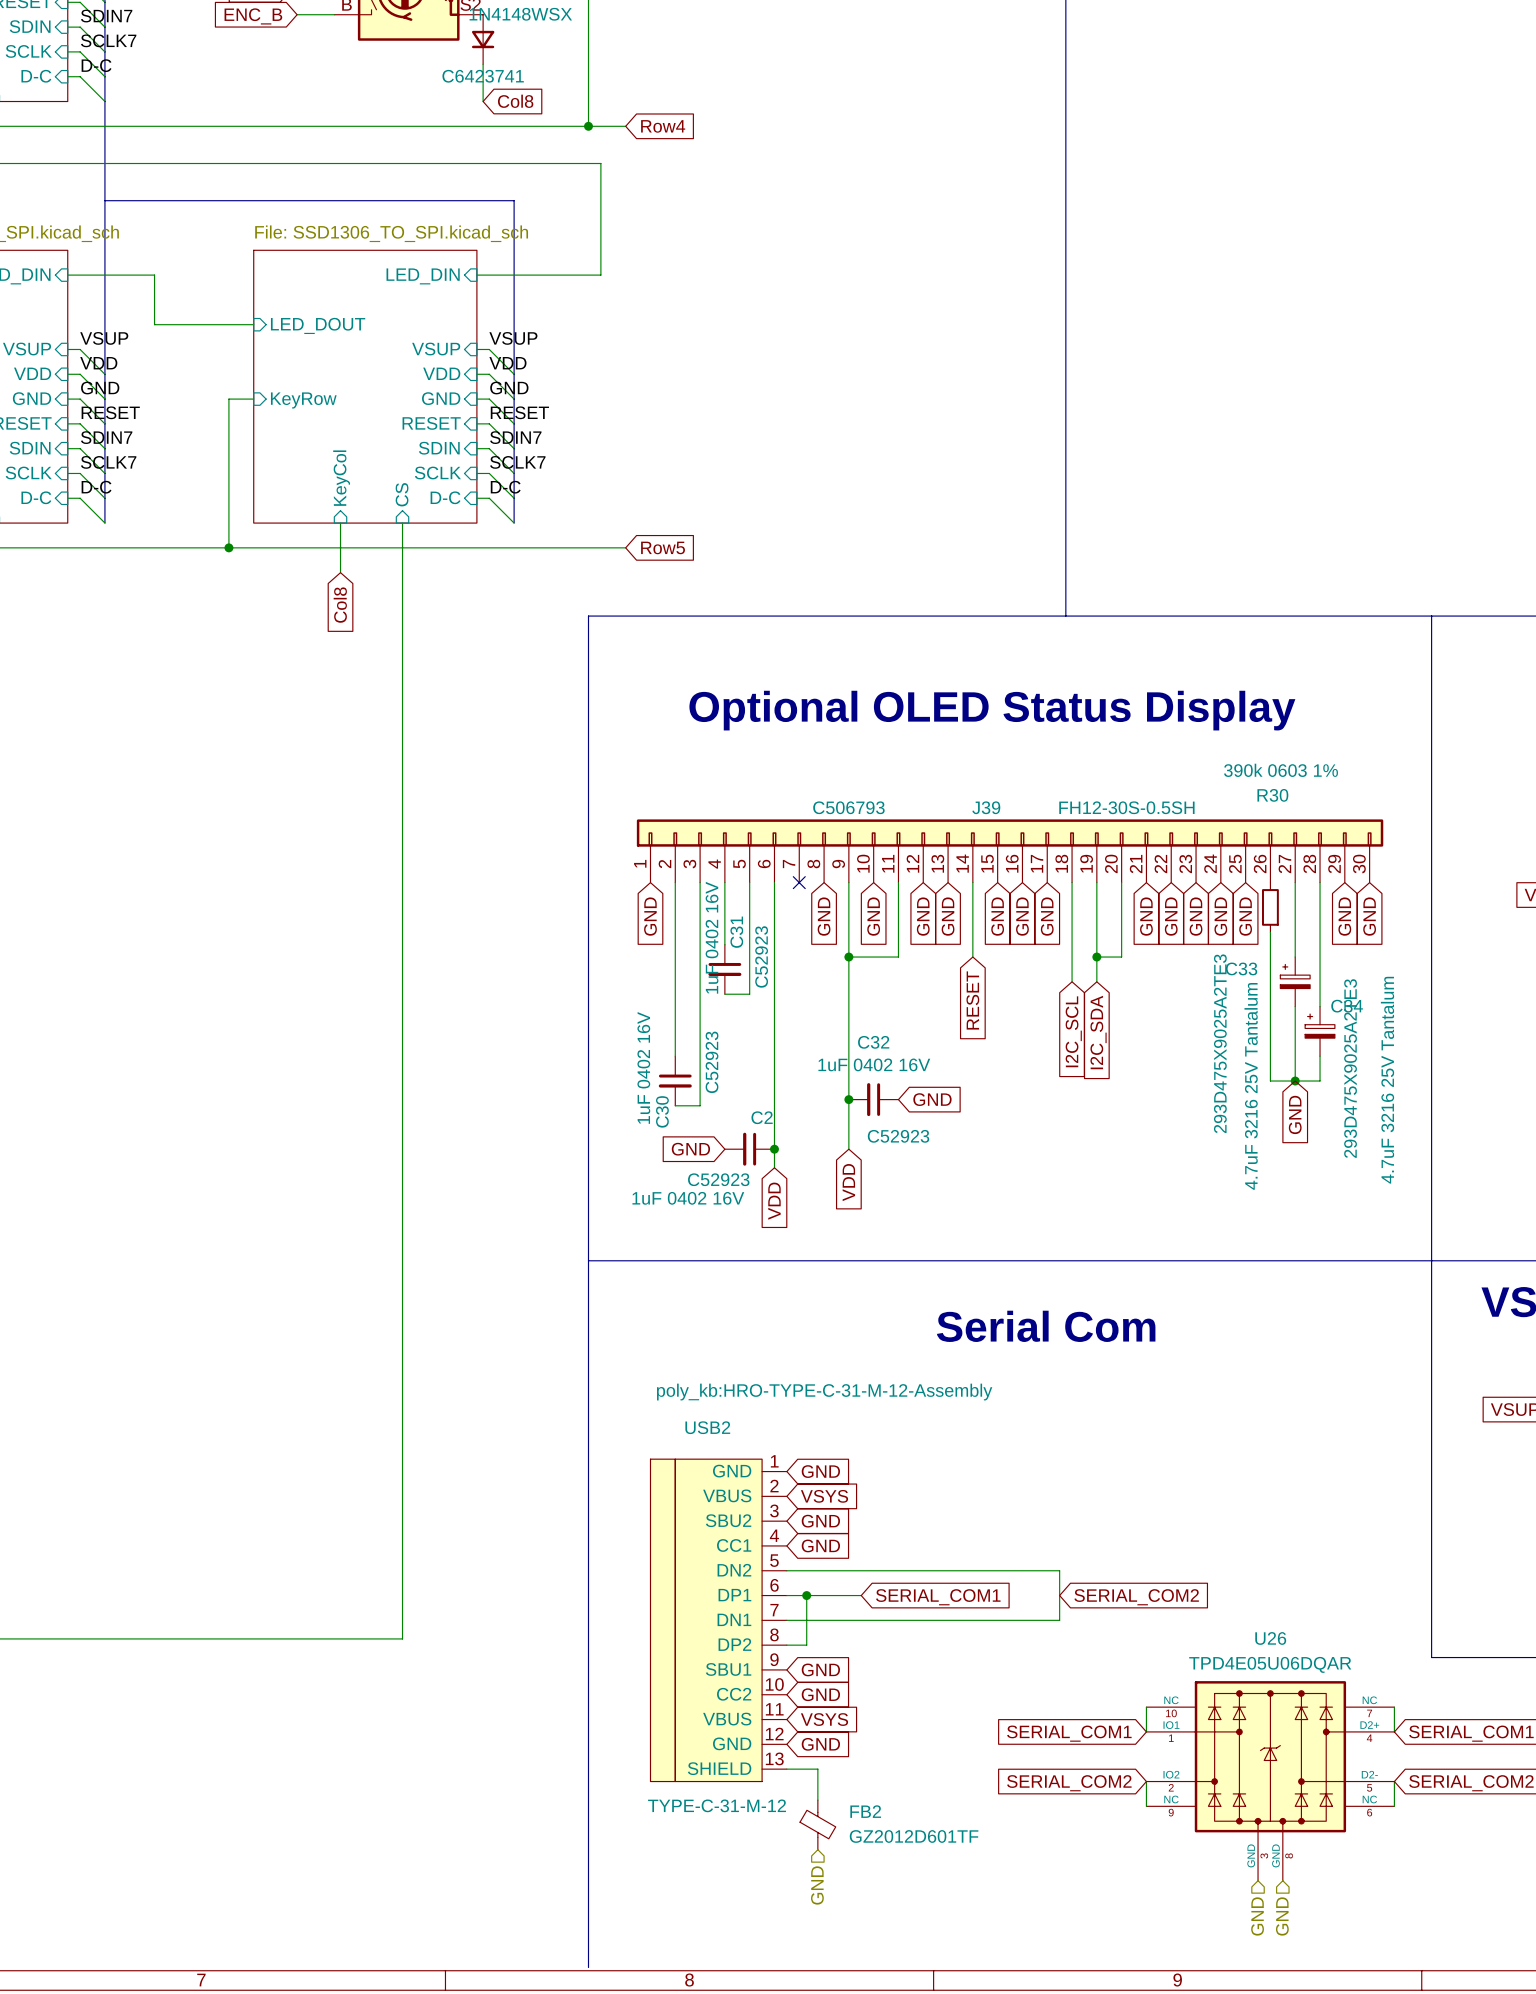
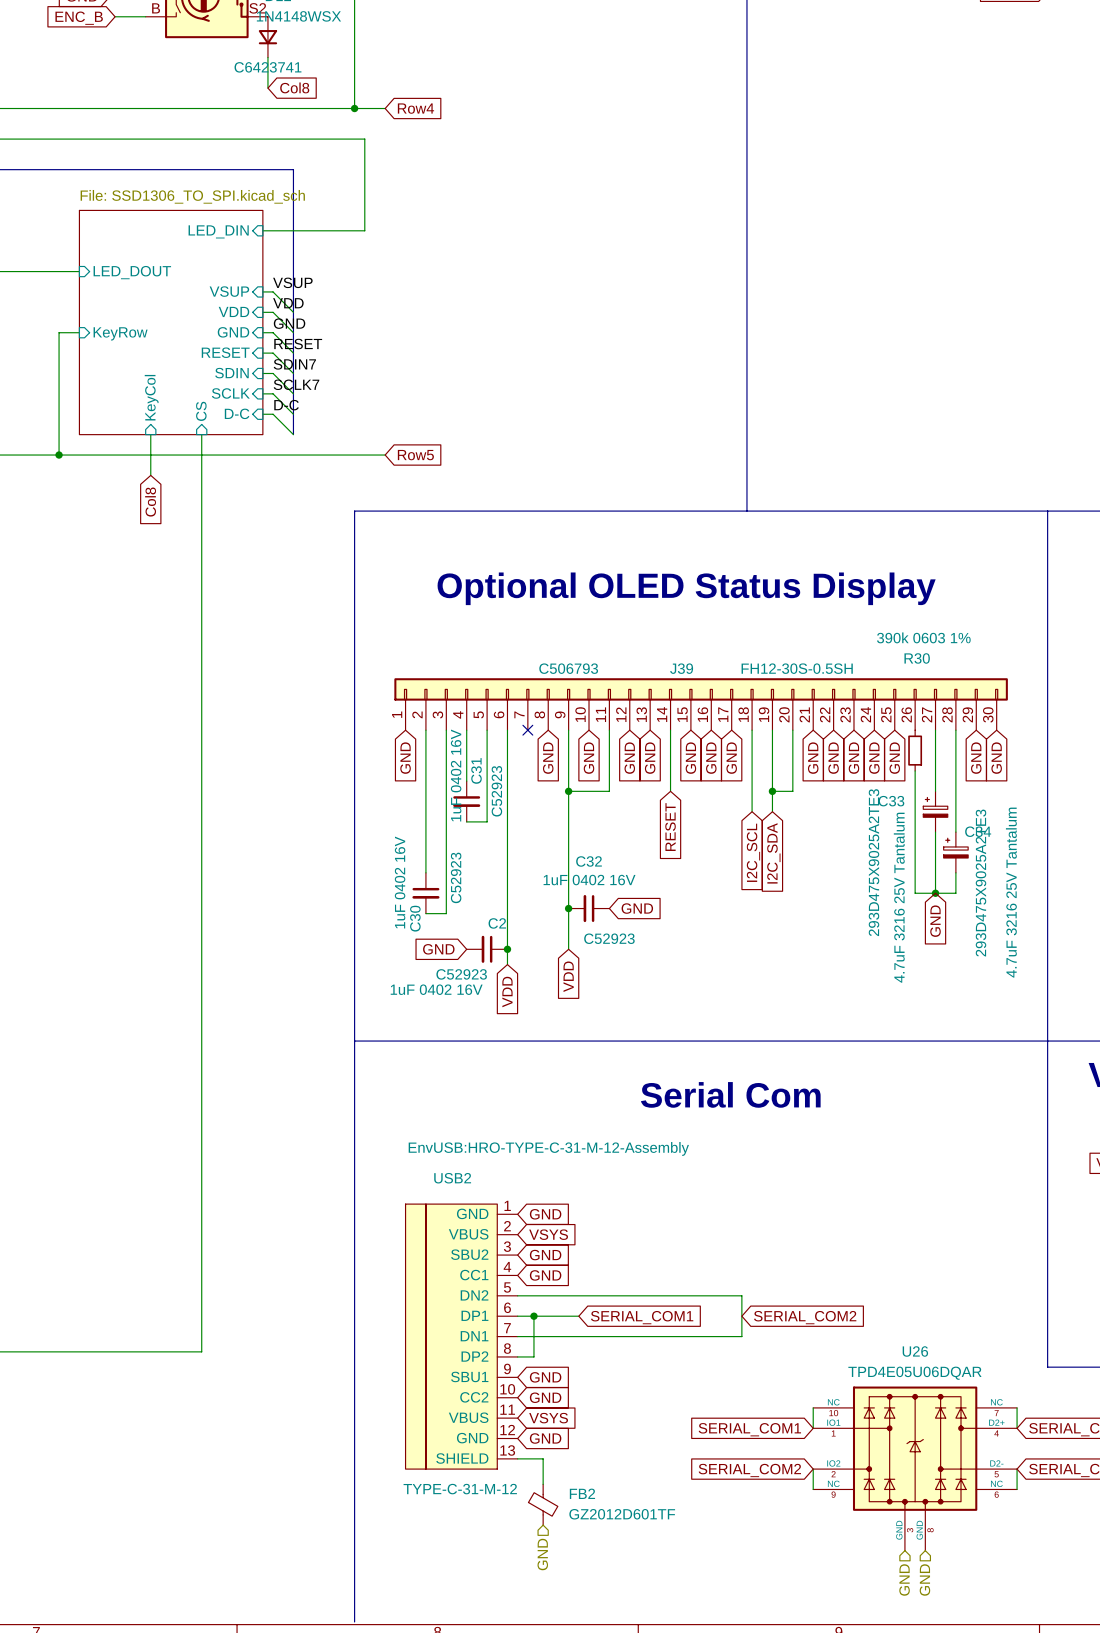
USB2 text: poly_kb:HRO-TYPE-C-31-M-12-Assembly (824, 1392) -> EnvUSB:HRO-TYPE-C-31-M-12-Assembly (548, 1148)

